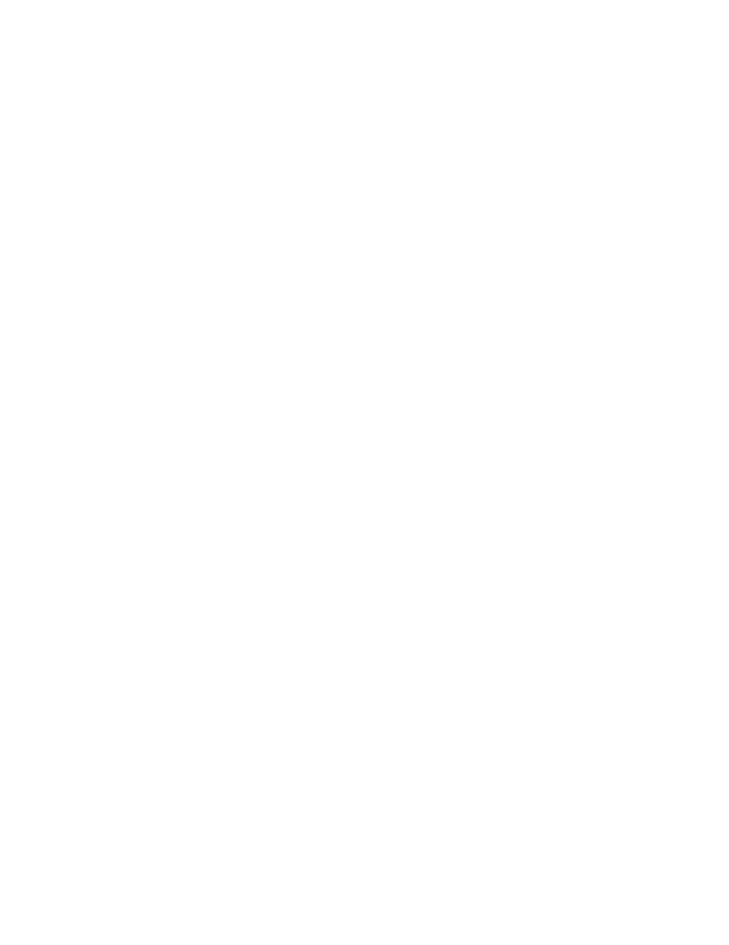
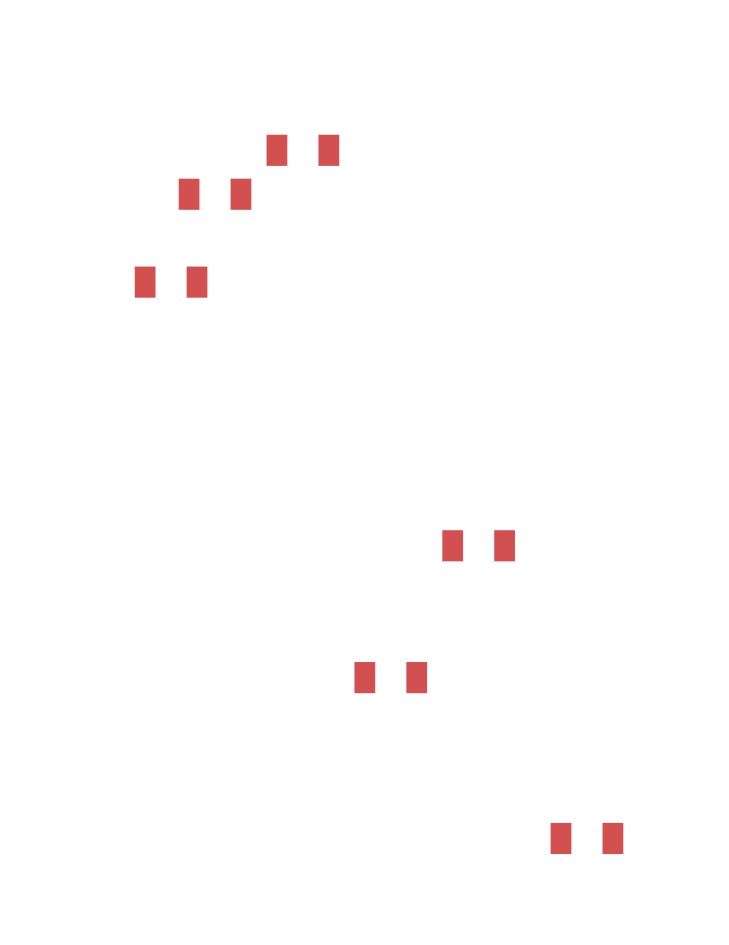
part: none -> (302, 150)
part: none -> (215, 194)
part: none -> (171, 282)
part: none -> (478, 545)
part: none -> (390, 677)
part: none -> (586, 838)

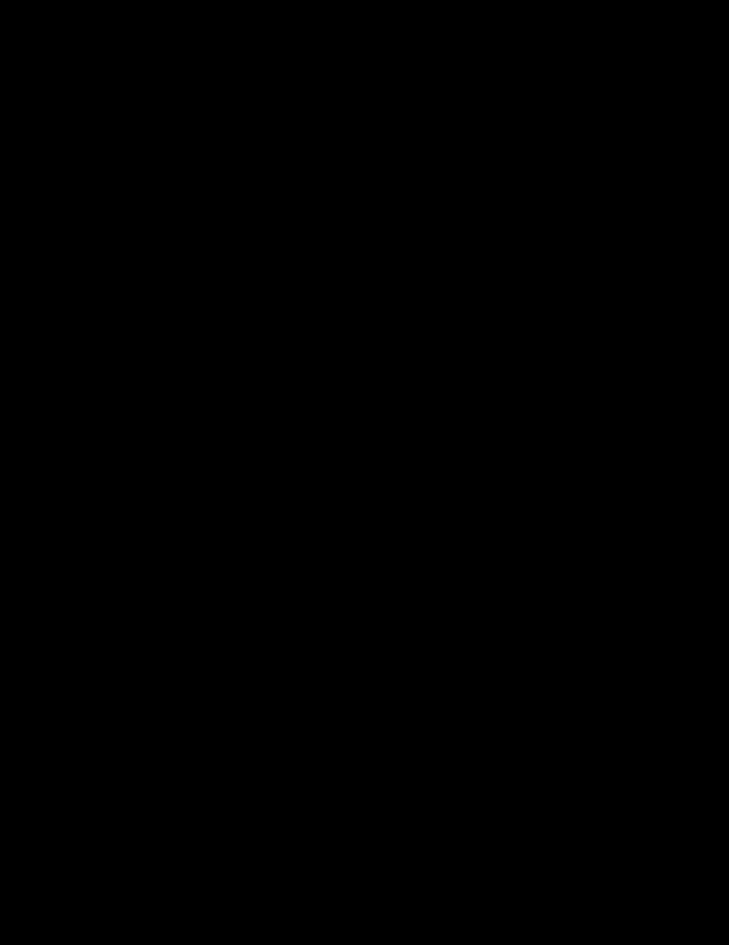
part: (302, 150) -> none
part: (215, 194) -> none
part: (171, 282) -> none
part: (478, 545) -> none
part: (390, 677) -> none
part: (586, 838) -> none

